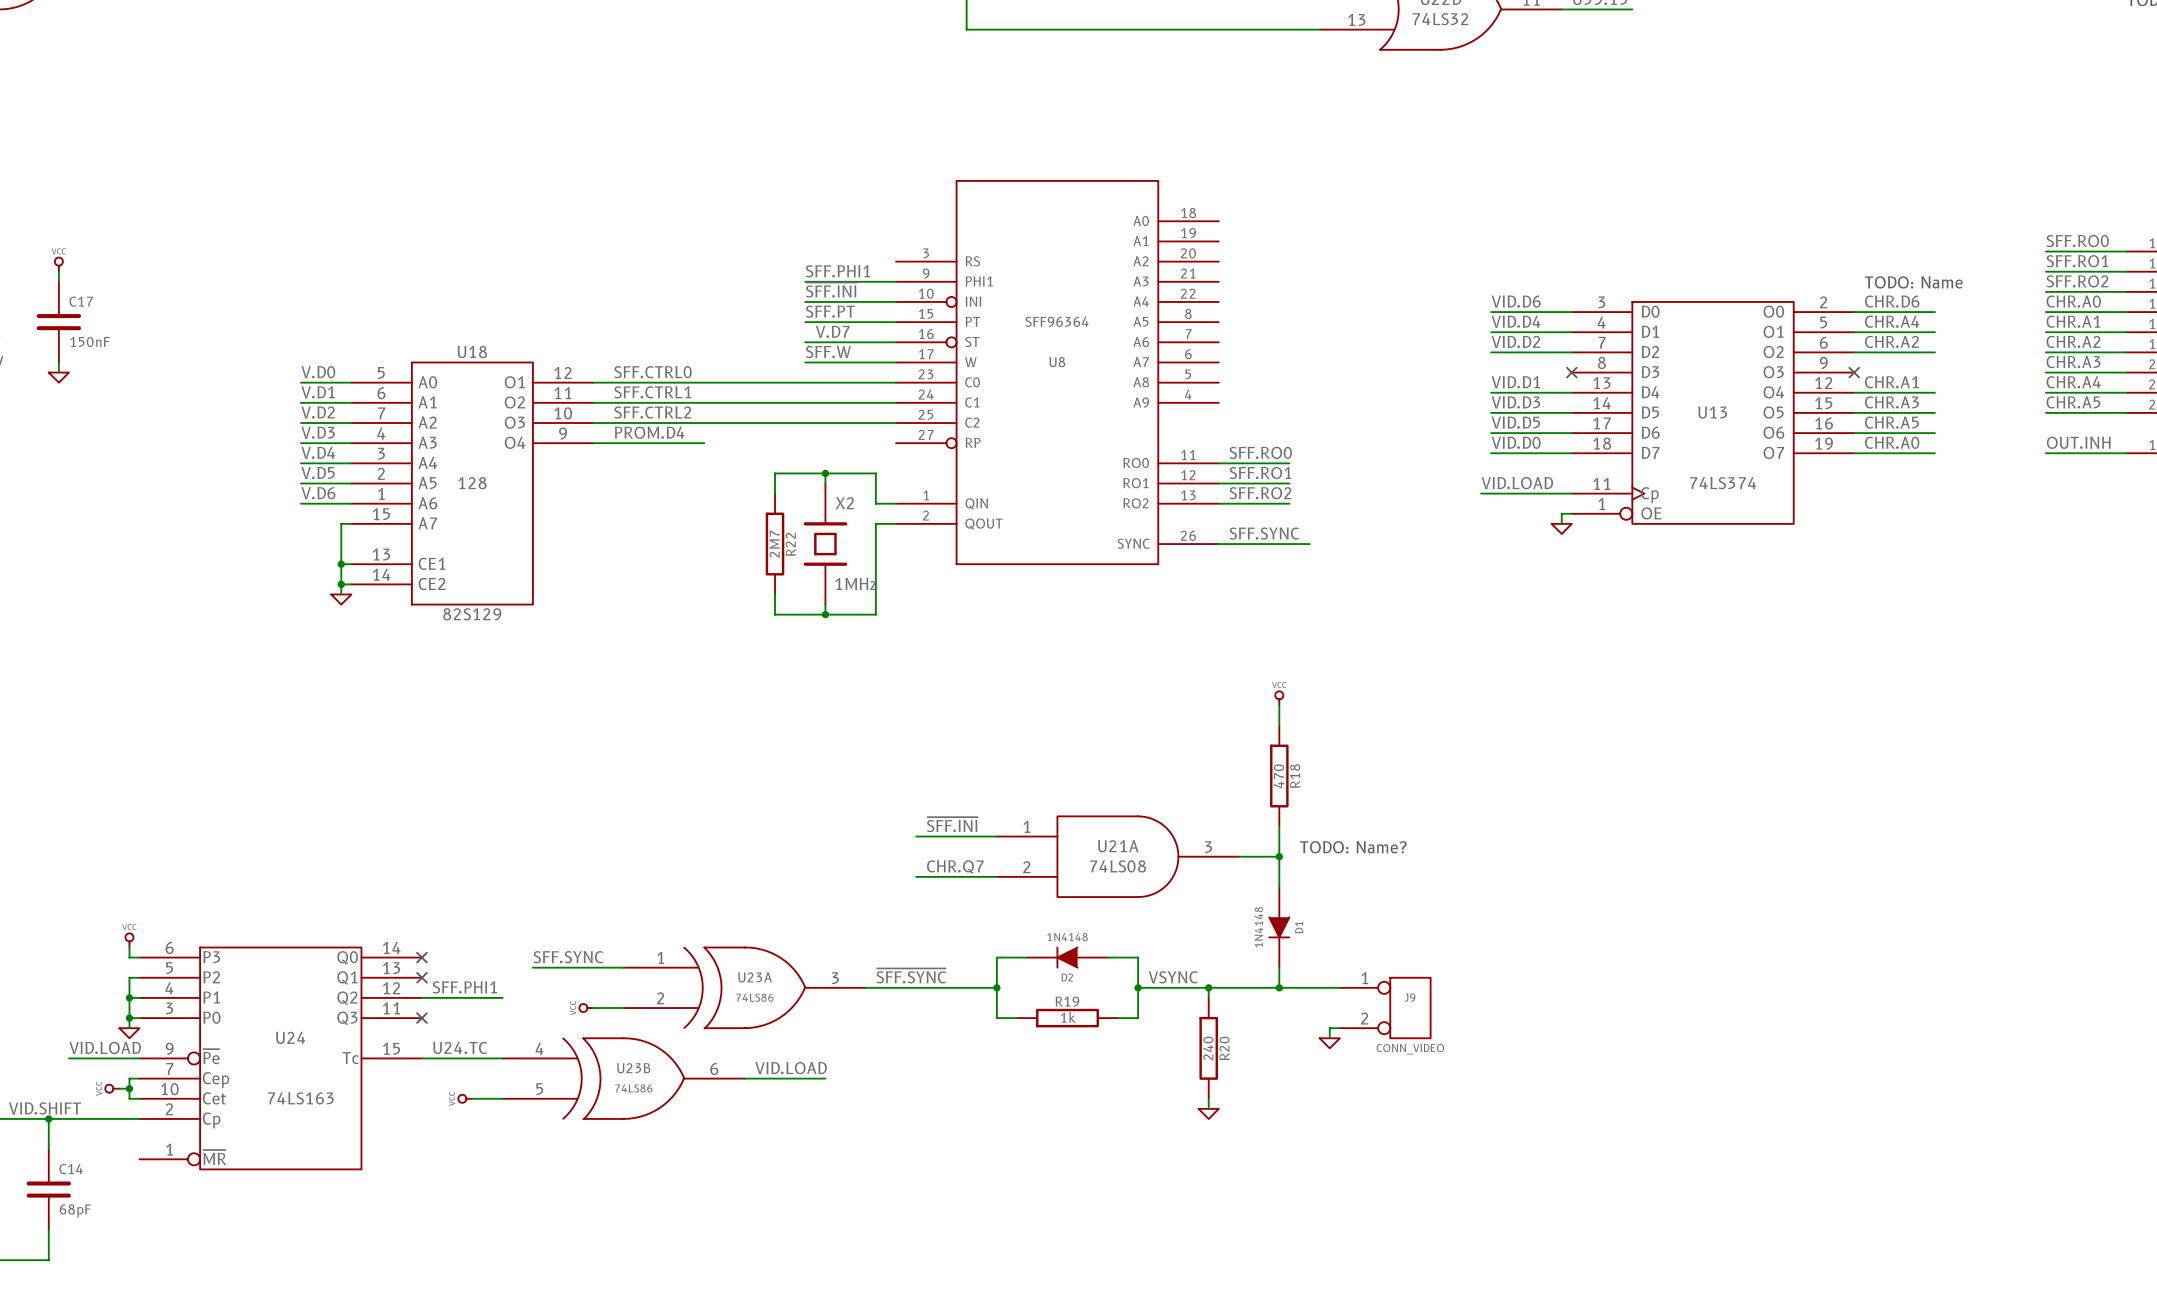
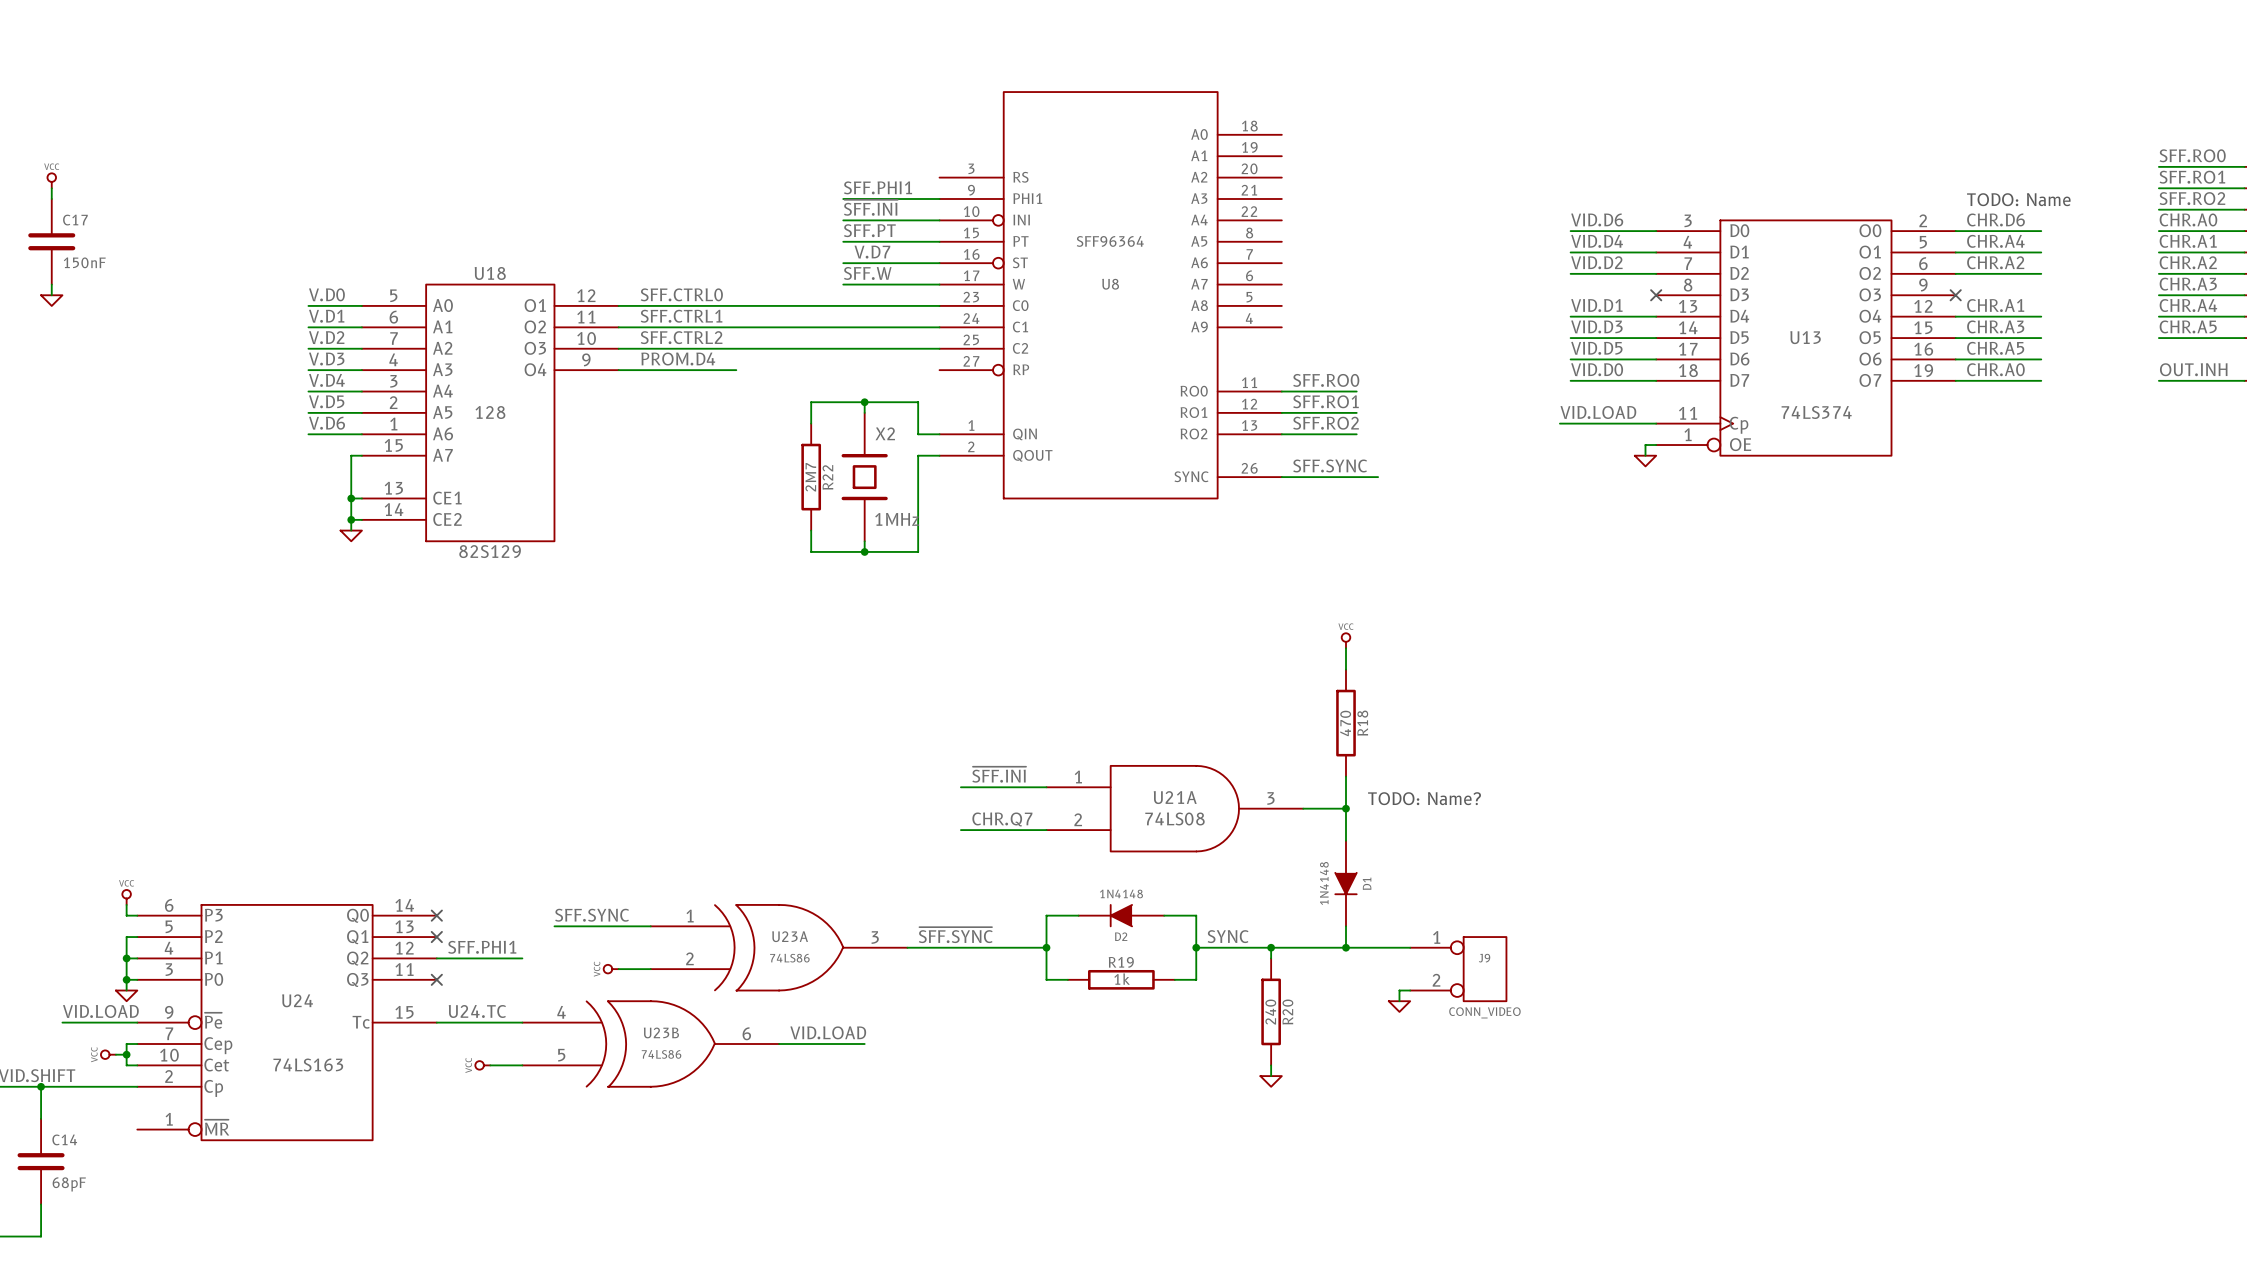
label: VSYNC (1173, 977) -> SYNC (1228, 936)

